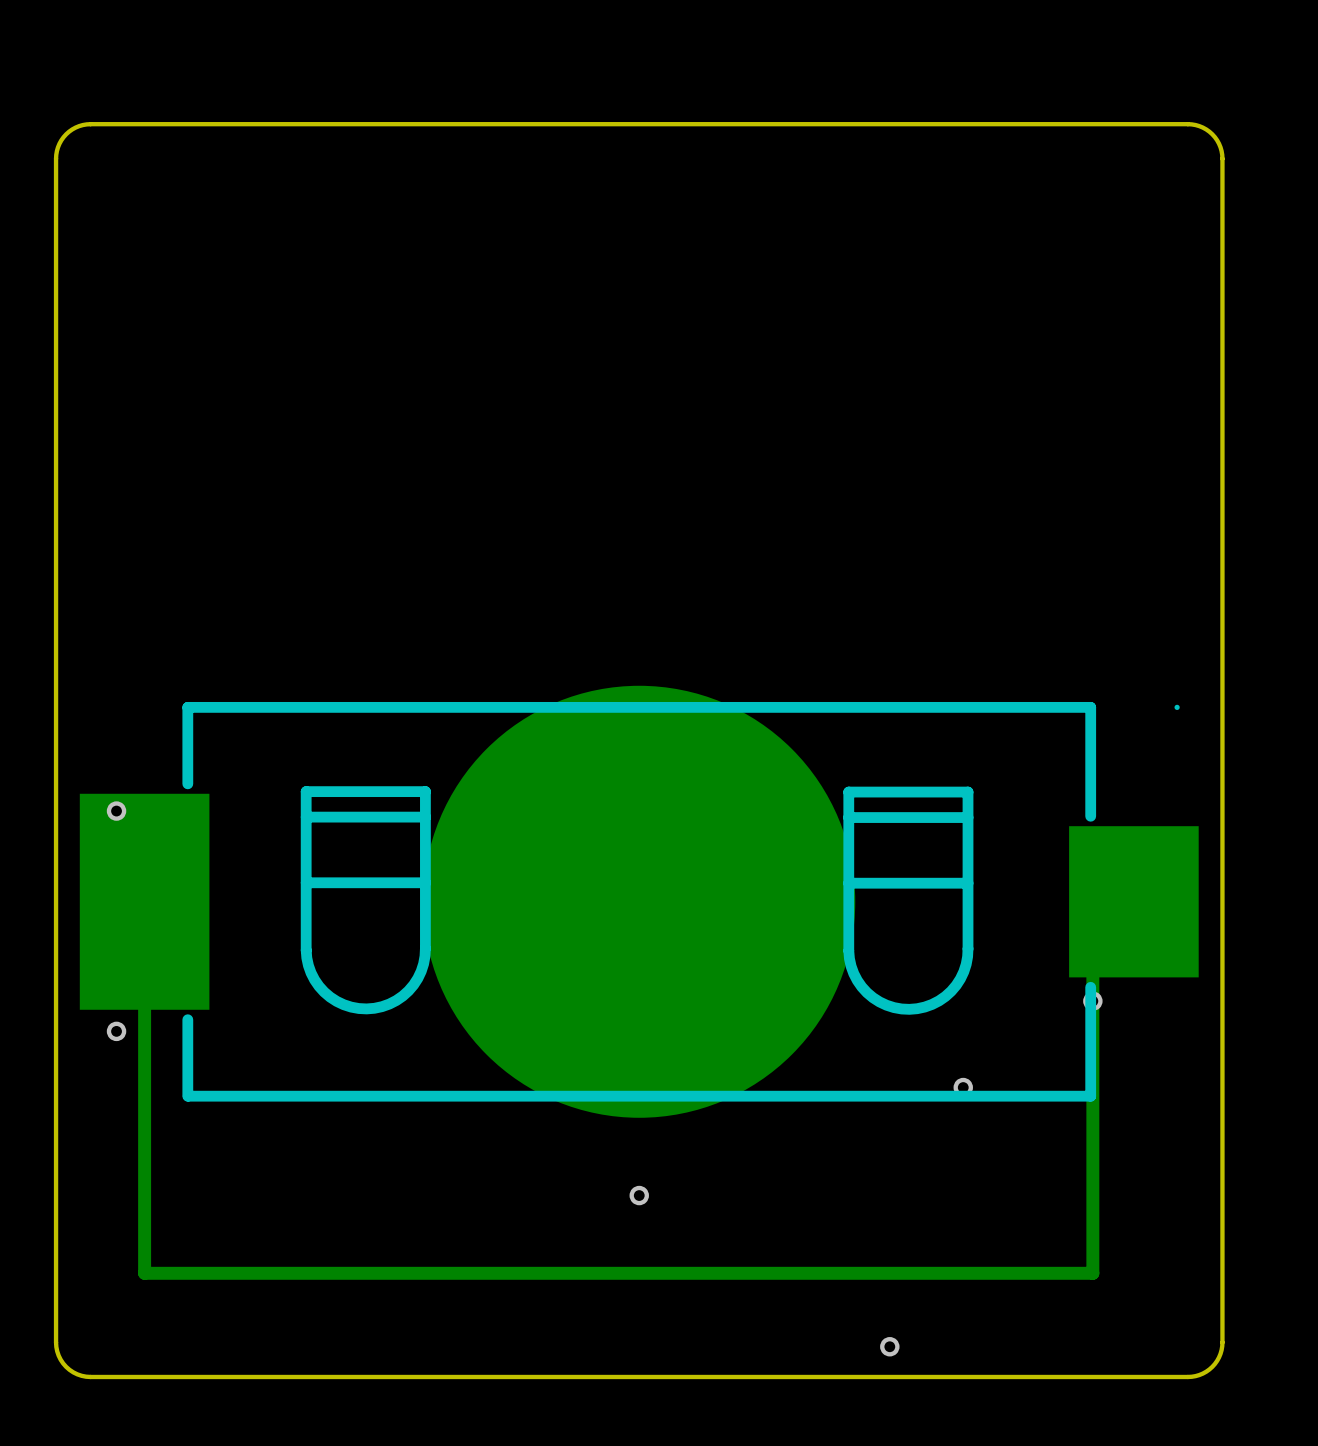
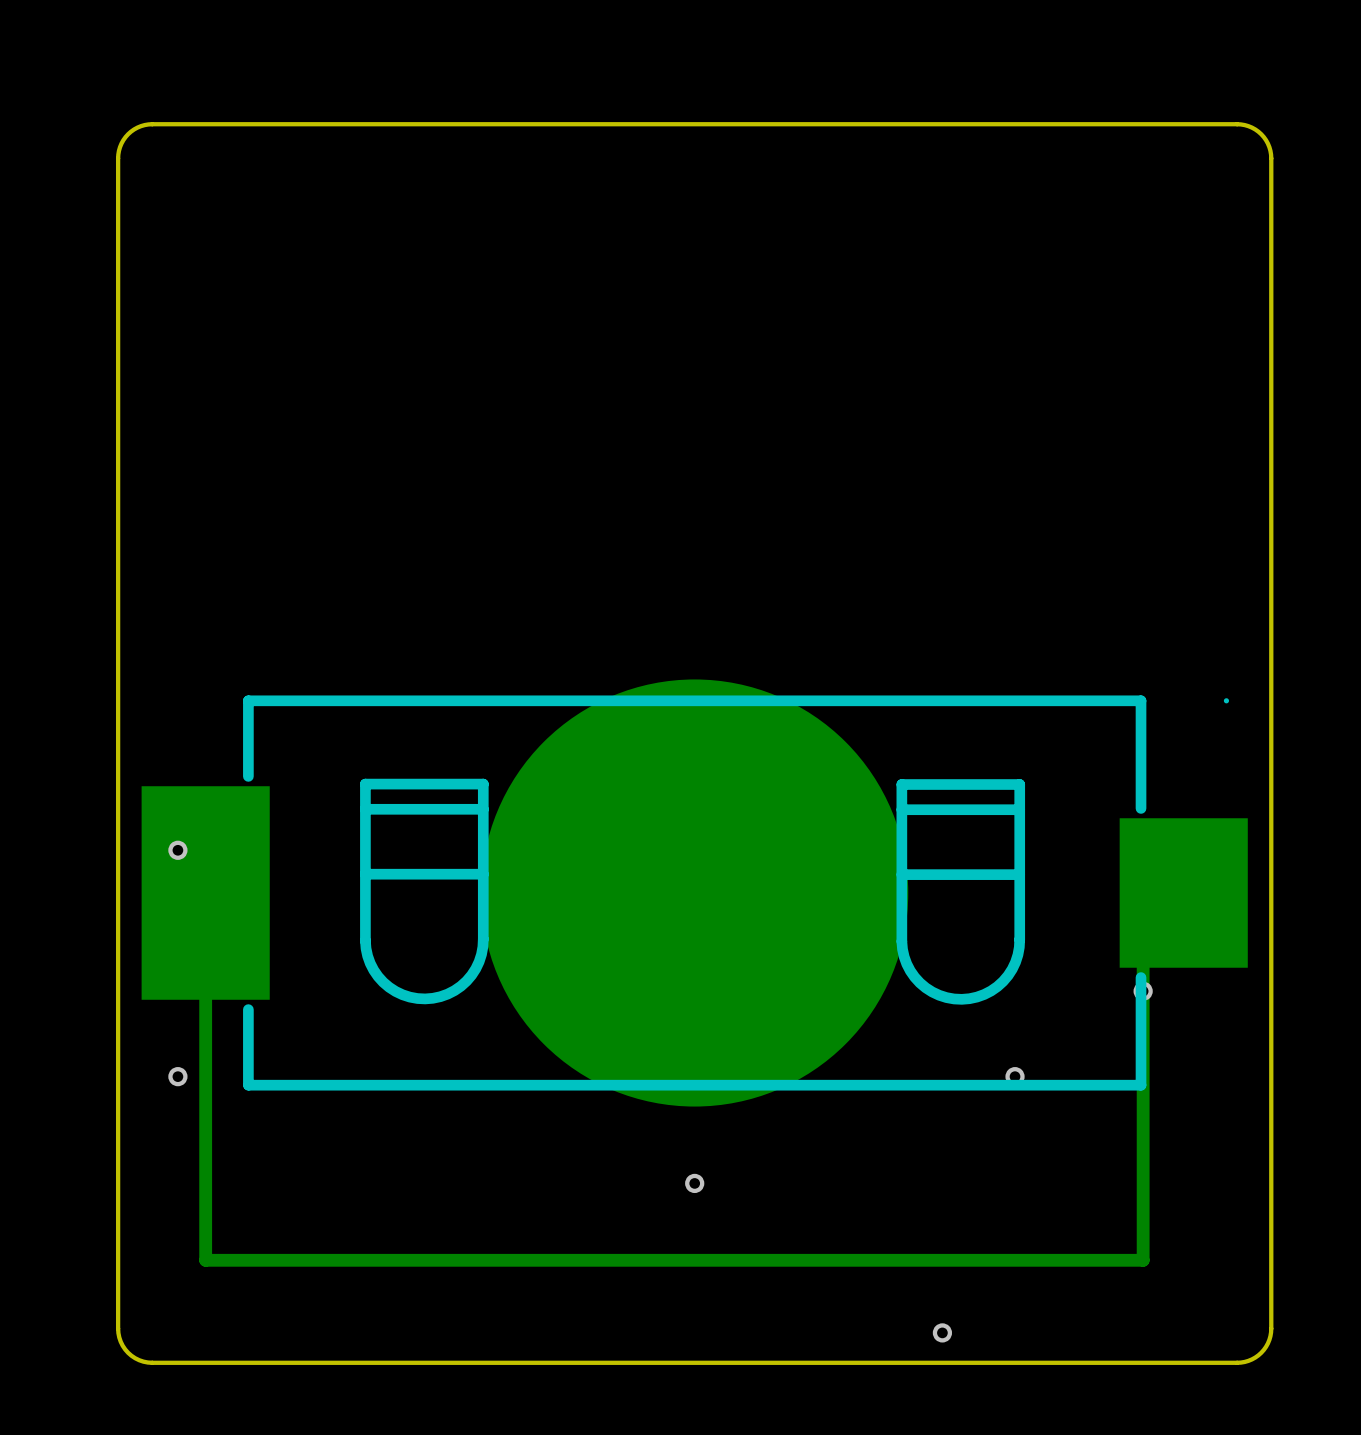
via position: (116, 811) -> (177, 850)
via position: (116, 1031) -> (177, 1076)

